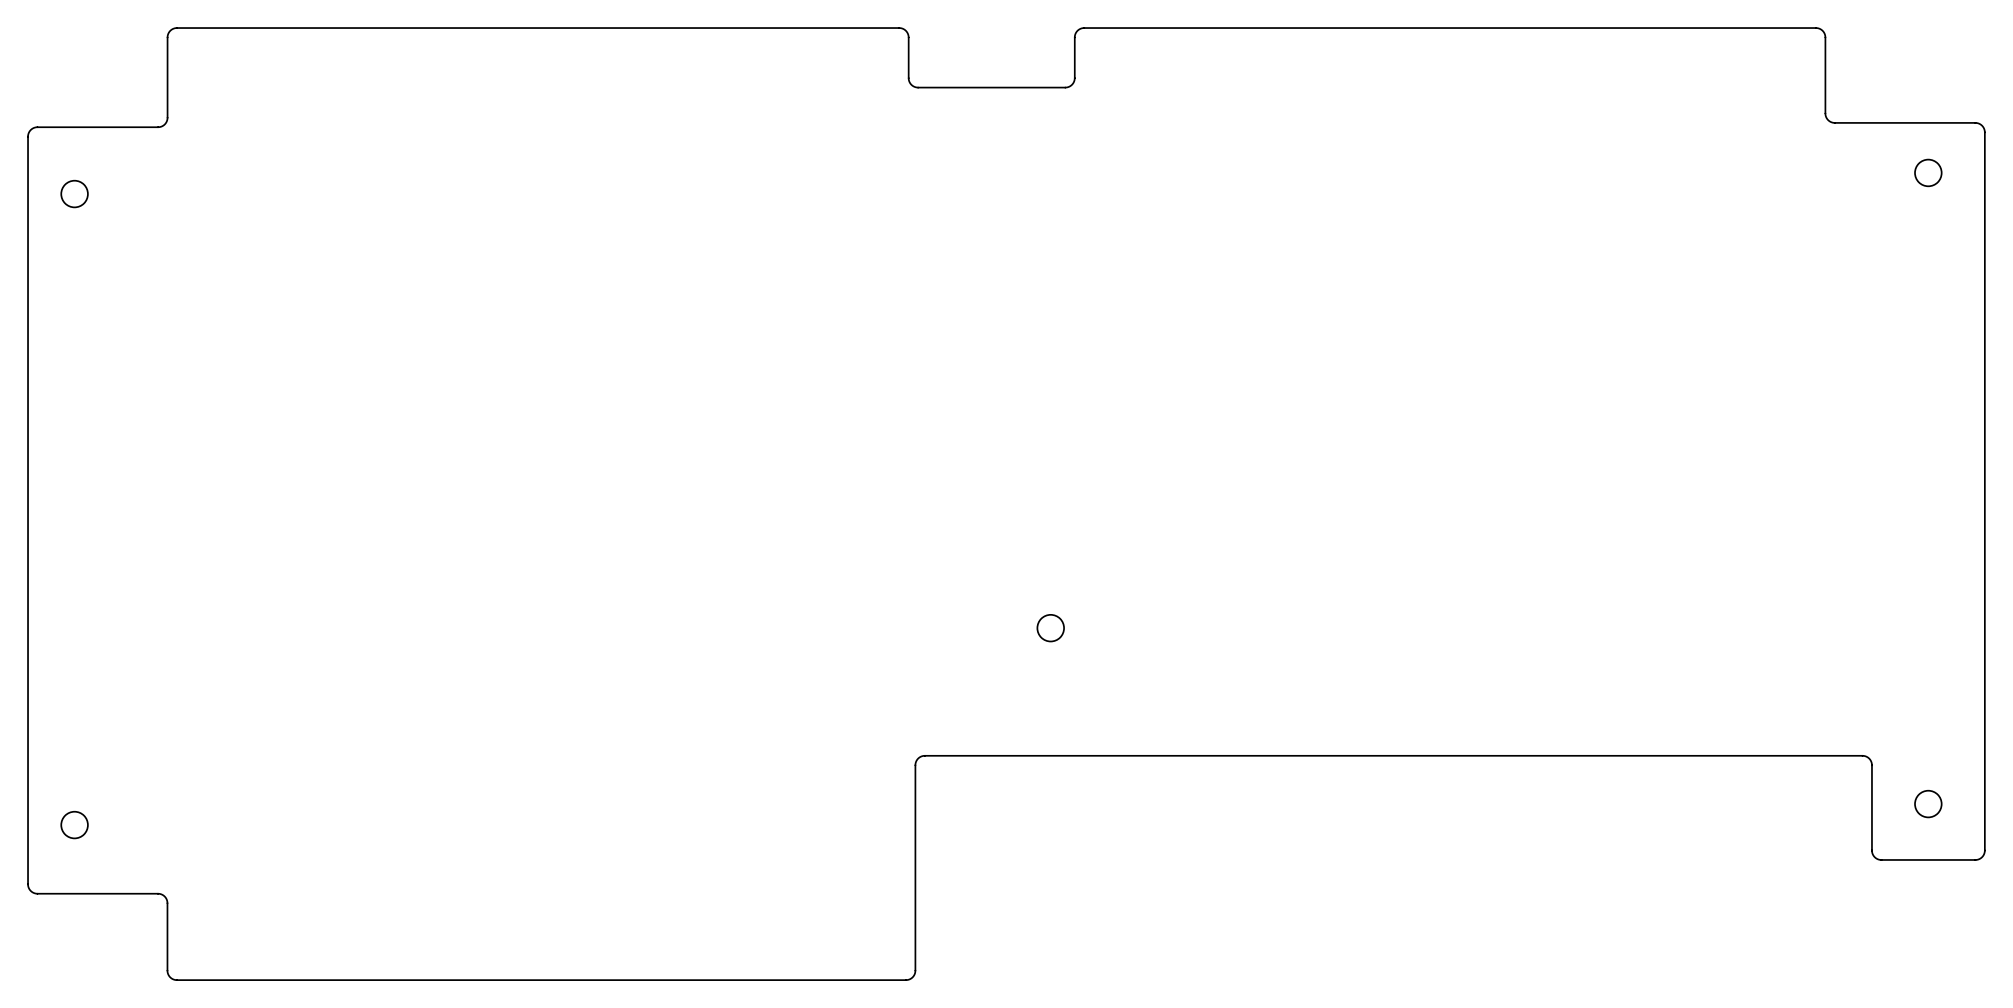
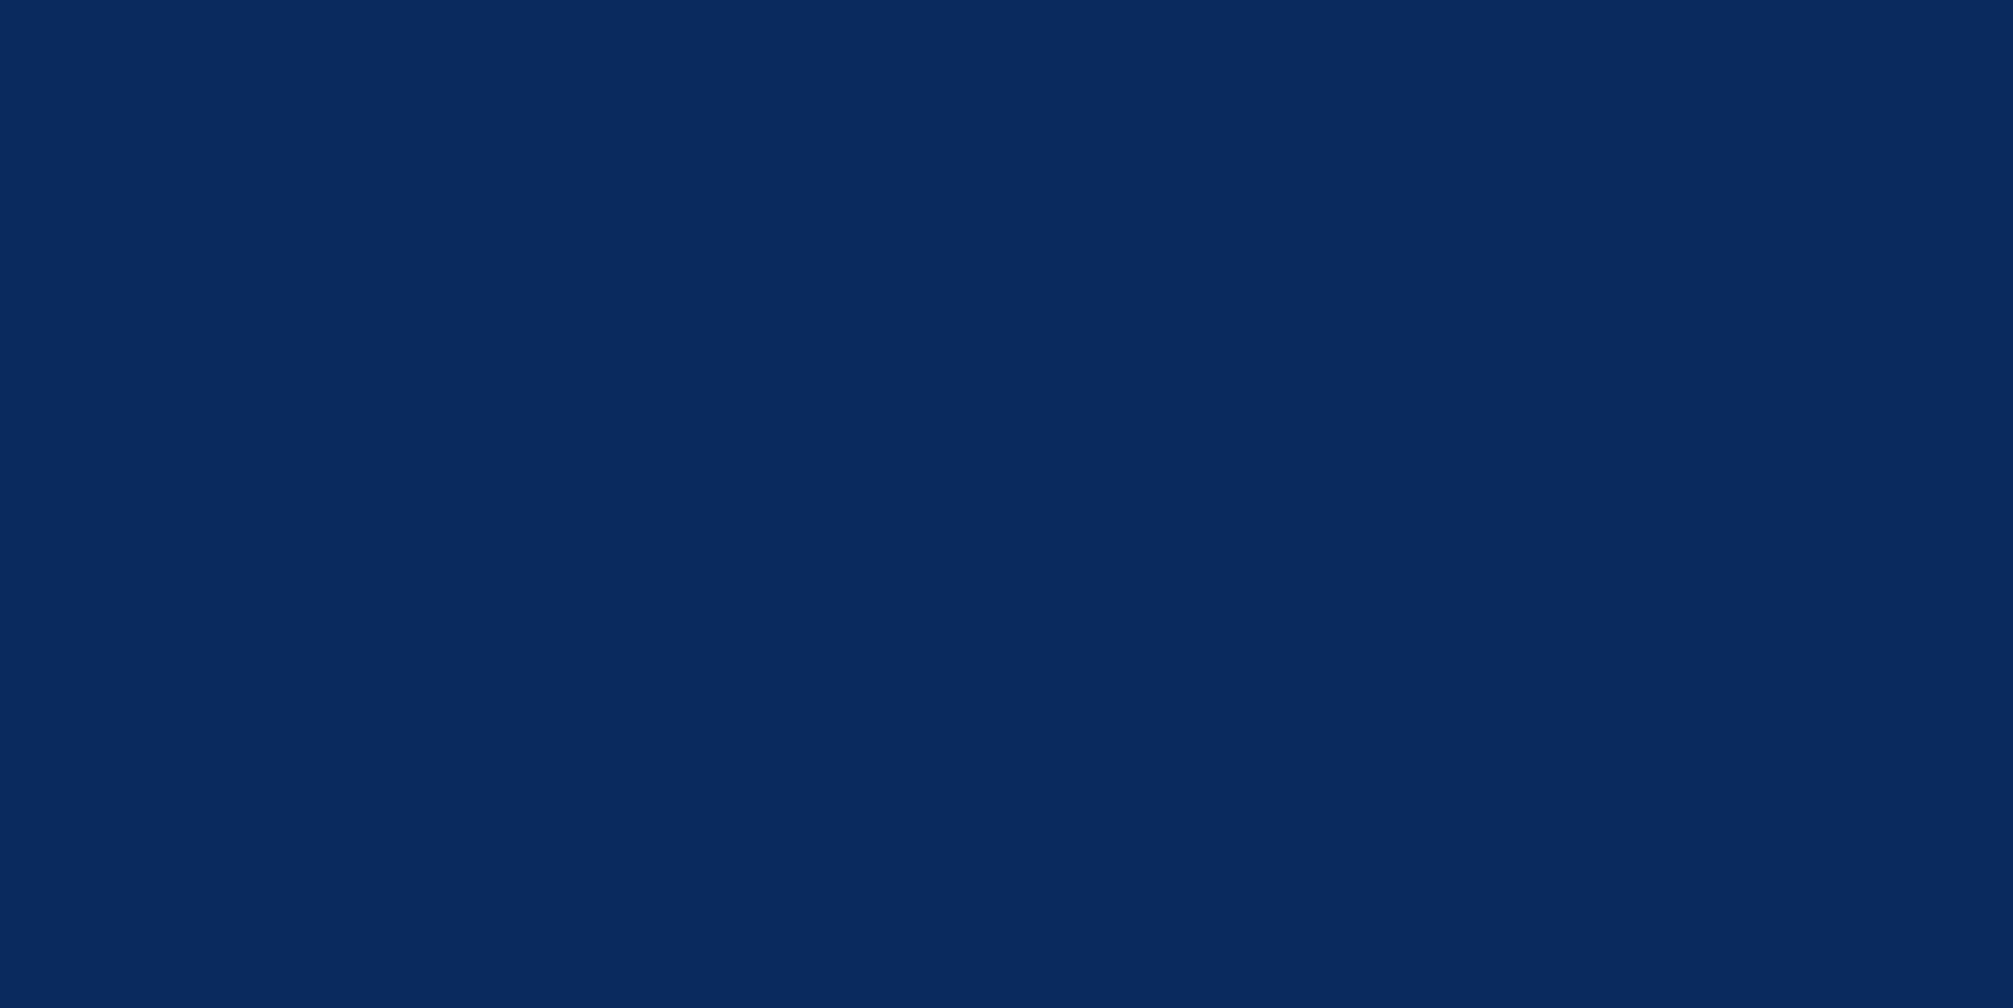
board edge: (177, 28) (900, 28) (905, 30) (908, 36) (908, 80) (912, 85) (918, 87) (1068, 86) (1074, 79) (1075, 35) (1078, 29) (1084, 28) (1819, 28) (1825, 36) (1825, 113) (1830, 121) (1975, 122) (1981, 124) (1984, 129) (1984, 854) (1980, 858) (1975, 859) (1881, 859) (1875, 858) (1871, 850) (1871, 764) (1869, 758) (1863, 755) (923, 755) (918, 758) (915, 764) (915, 970) (913, 976) (908, 979) (173, 979) (167, 971) (167, 903) (162, 895) (36, 893) (30, 890) (28, 885) (28, 136) (29, 130) (36, 127) (158, 127) (163, 125) (167, 117) (167, 36) (170, 30) (177, 28) -> none
round board edge: [1914, 159, 1942, 187] -> none
round board edge: [60, 180, 89, 208] -> none
round board edge: [1037, 614, 1065, 642] -> none
round board edge: [1914, 790, 1942, 818] -> none
round board edge: [60, 811, 89, 839] -> none

